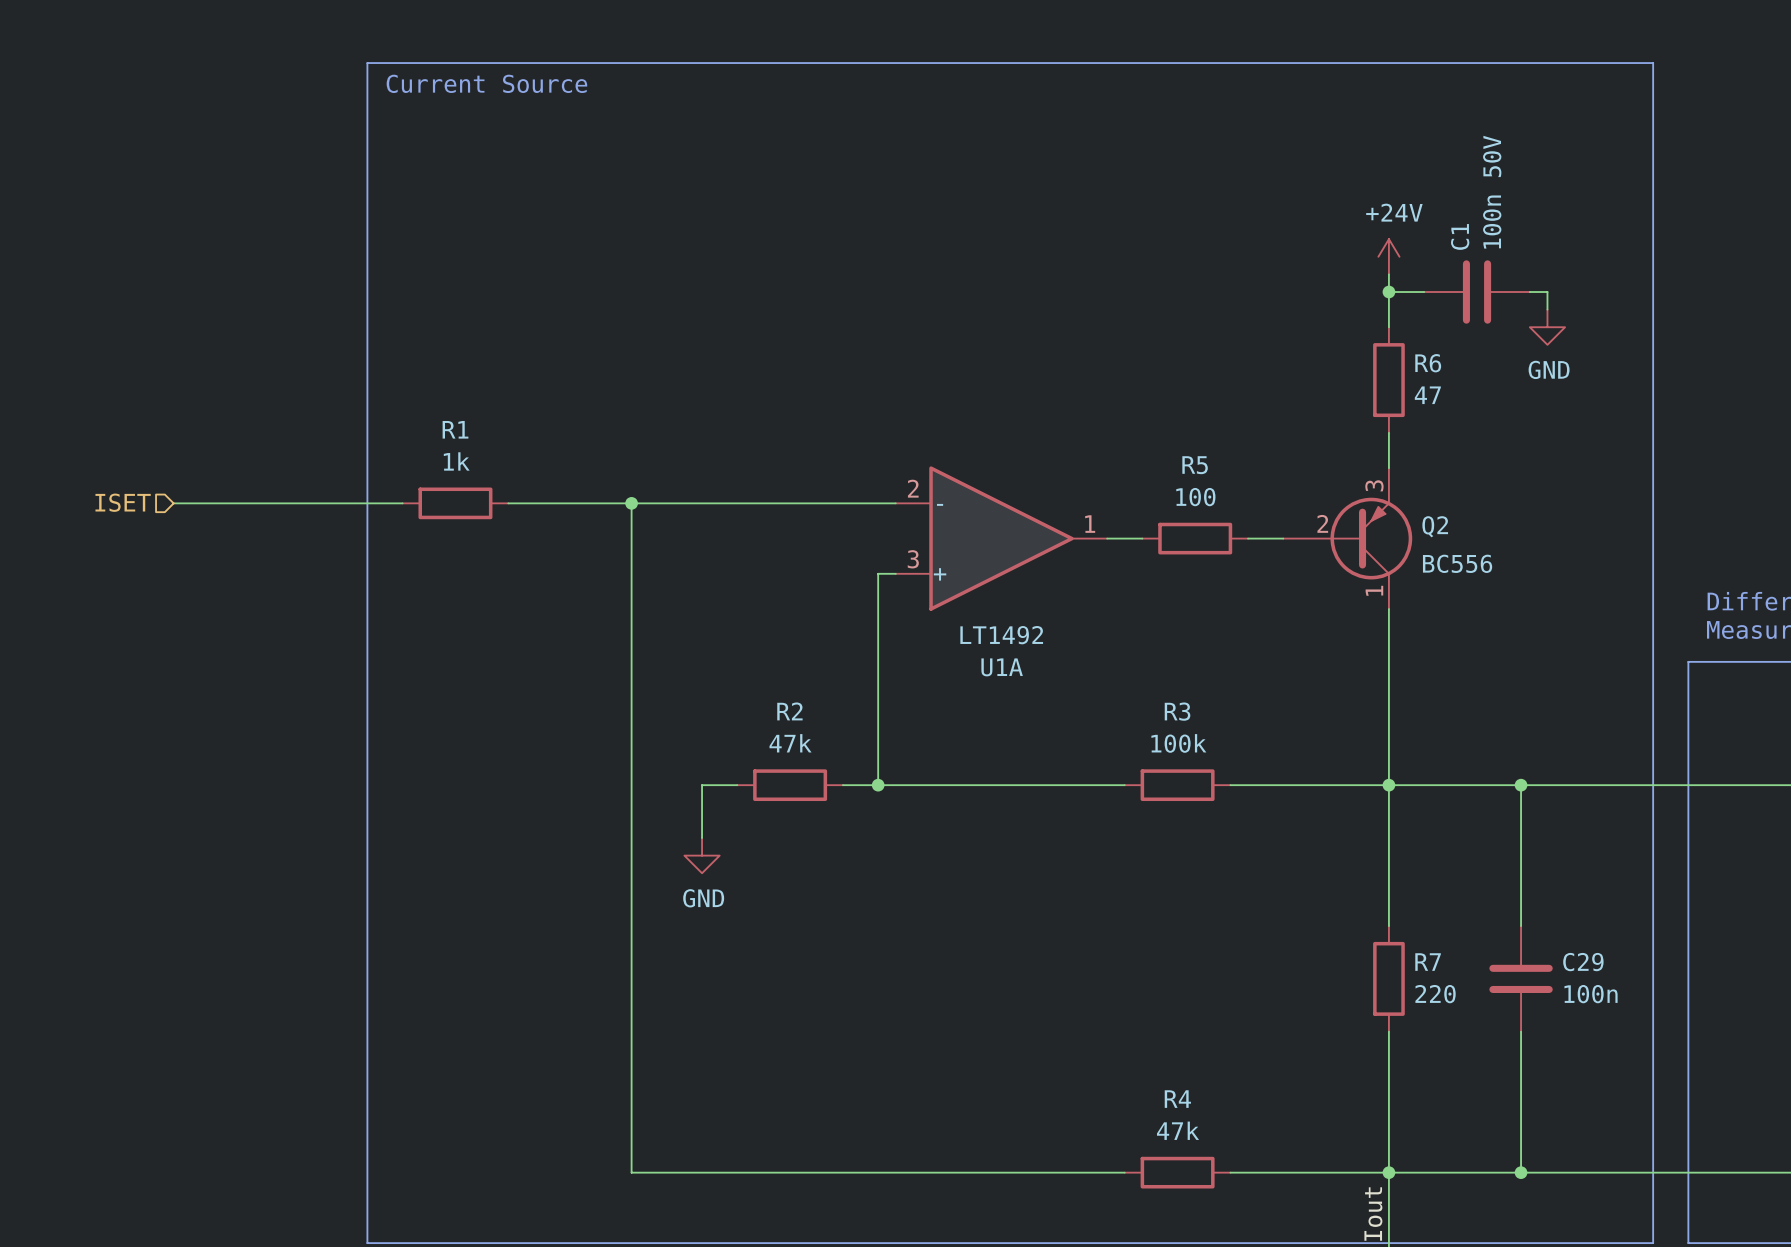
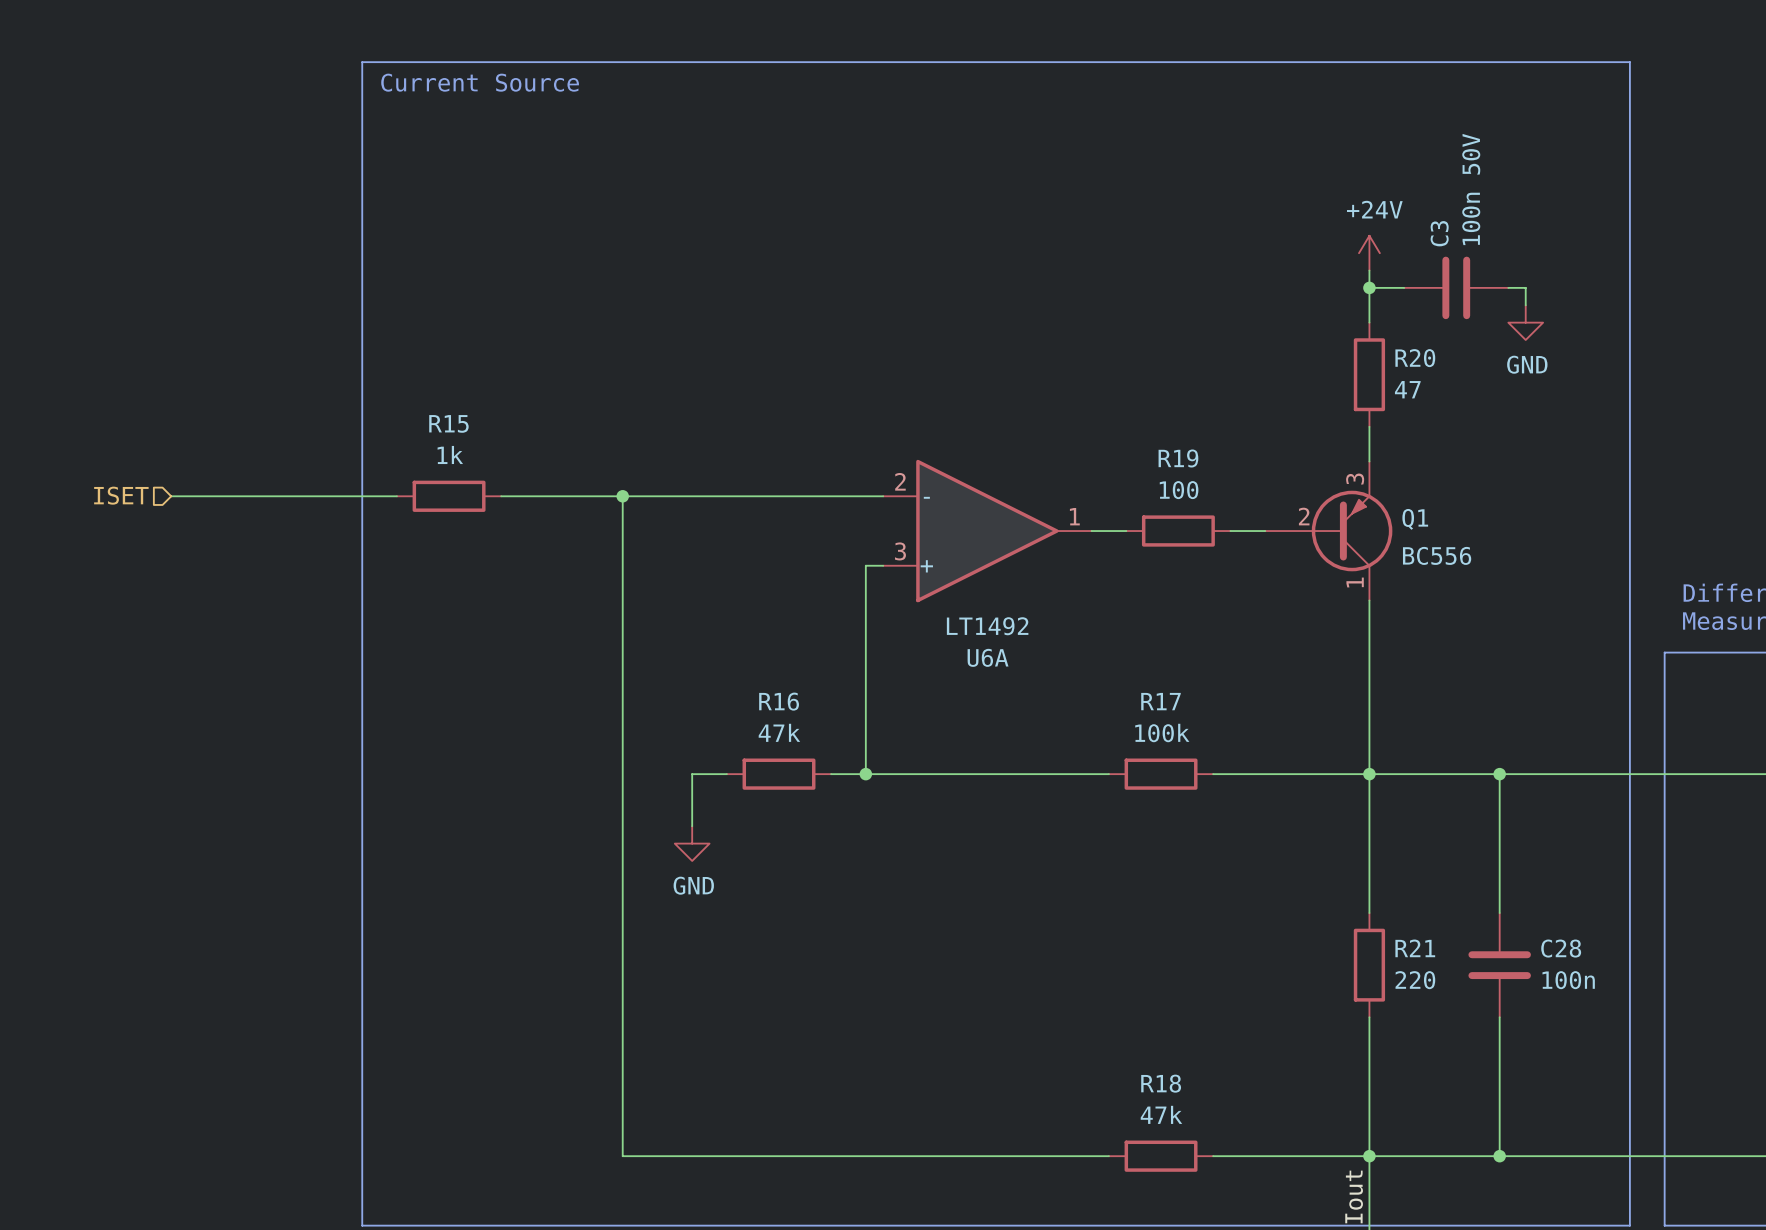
C1 name: C1 (1460, 236) -> C3 (1439, 233)
R6 name: R6 (1428, 363) -> R20 (1415, 358)
R1 name: R1 (455, 429) -> R15 (448, 423)
R5 name: R5 (1195, 465) -> R19 (1178, 458)
Q2 name: Q2 (1435, 526) -> Q1 (1415, 519)
U1A name: U1A (1002, 667) -> U6A (988, 657)
R2 name: R2 (789, 711) -> R16 (779, 701)
R3 name: R3 (1177, 711) -> R17 (1160, 701)
R7 name: R7 (1428, 962) -> R21 (1415, 948)
C29 name: C29 (1583, 962) -> C28 (1561, 948)
R4 name: R4 (1177, 1099) -> R18 (1161, 1083)

